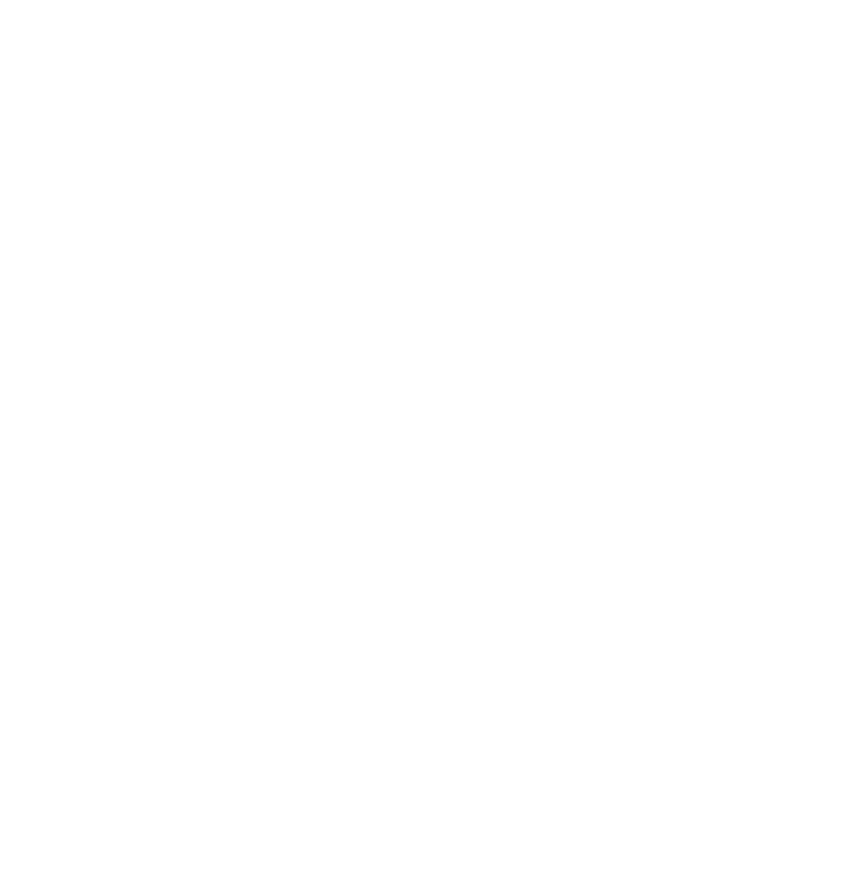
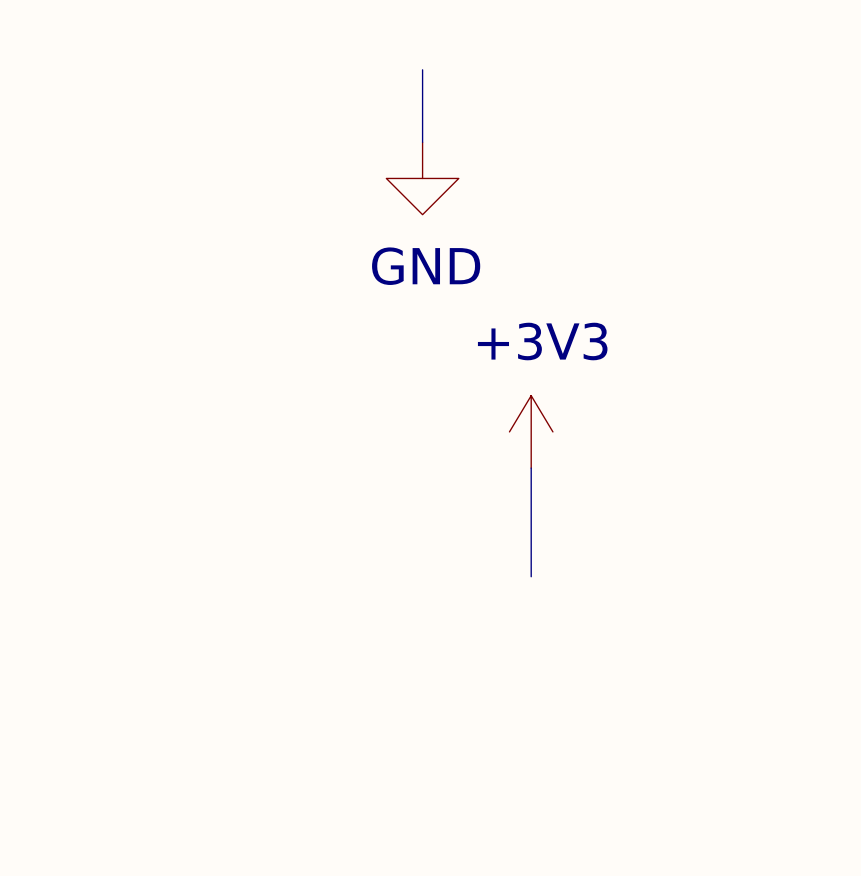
wire: none -> (422, 69) (422, 142)
power symbol: none -> GND (422, 178)
power symbol: none -> +3V3 (531, 431)
wire: none -> (531, 468) (531, 576)

